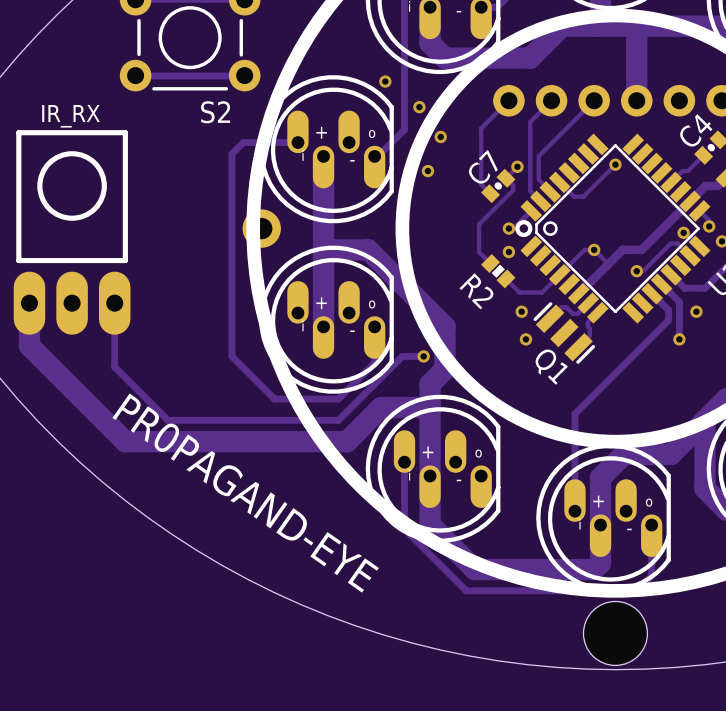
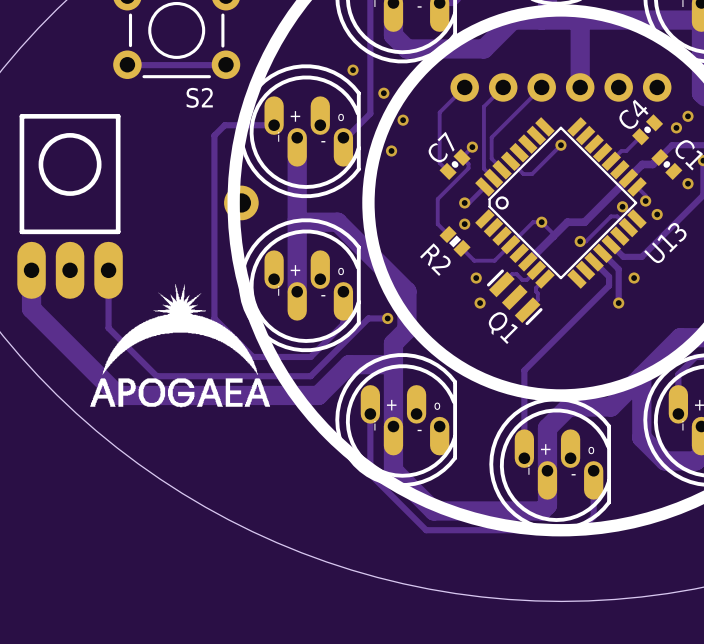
text: IR_RX (71, 116) -> none
drawing: [515, 220, 533, 238] -> none
drawing: none -> [90, 284, 271, 408]
text: PR0PAGAND-EYE (245, 493) -> none
hole: (615, 633) -> none

